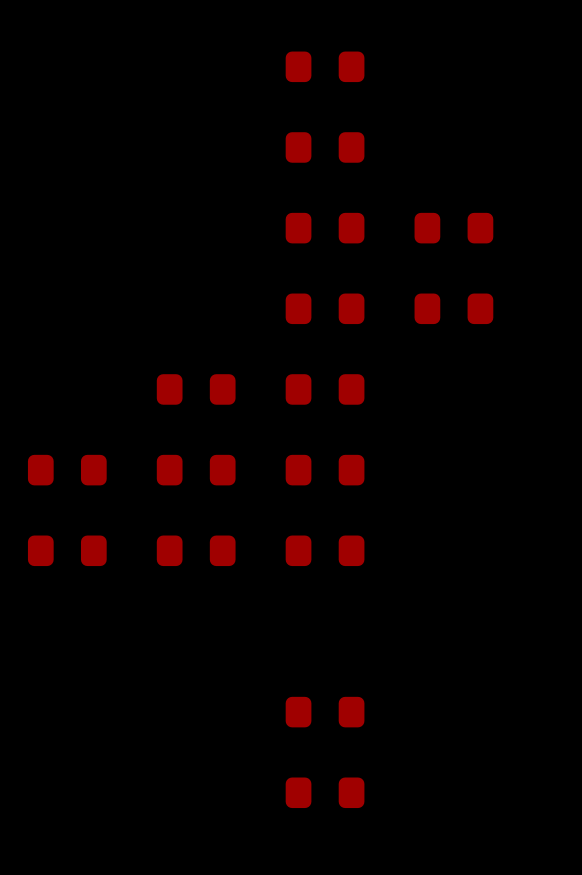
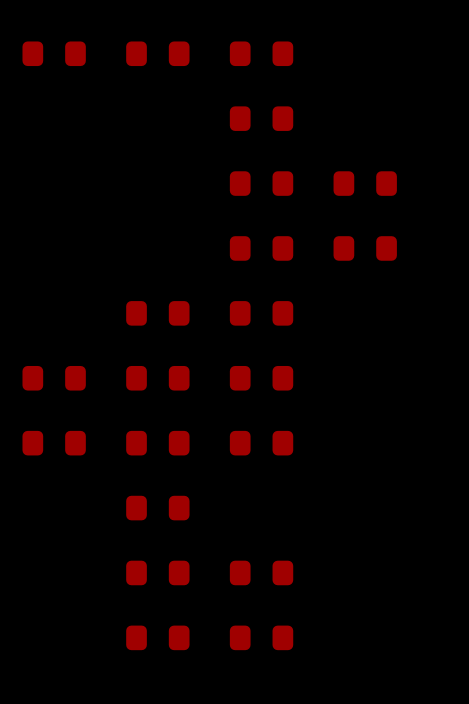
part: none -> (54, 53)
part: none -> (157, 53)
part: none -> (157, 508)
part: none -> (157, 572)
part: none -> (157, 637)

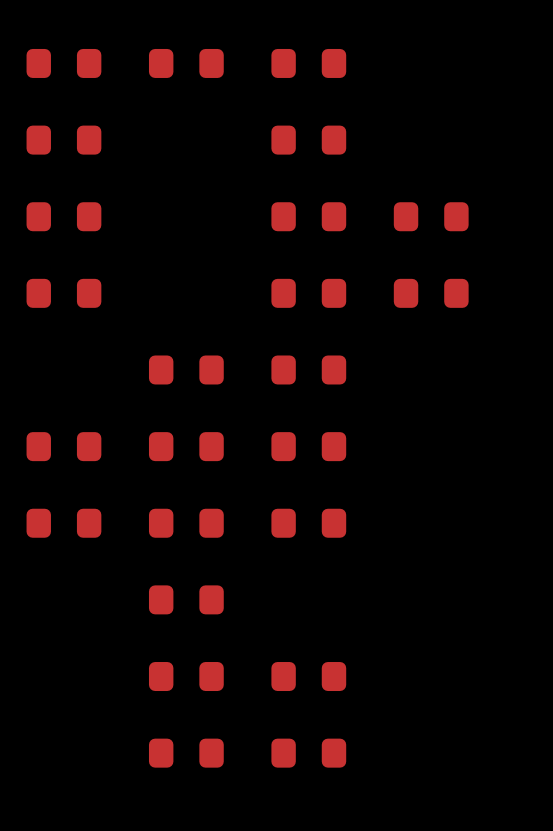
part: none -> (63, 140)
part: none -> (63, 216)
part: none -> (63, 293)

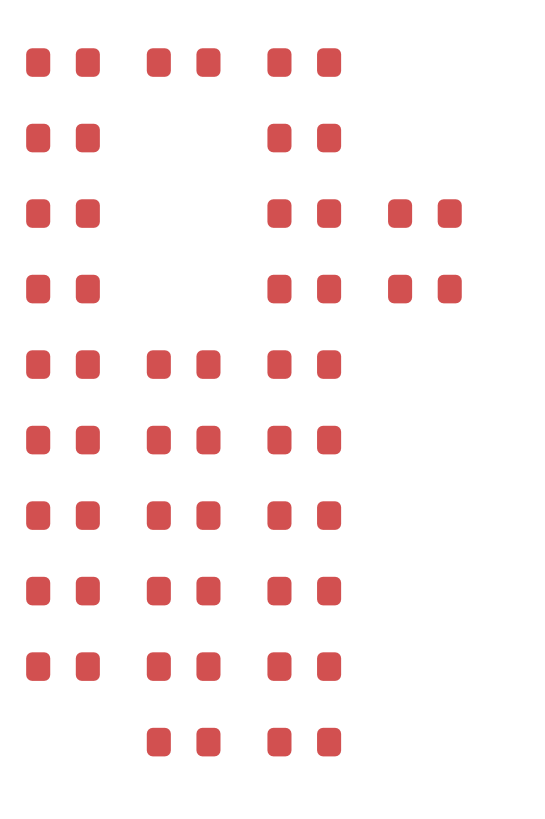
part: none -> (63, 364)
part: none -> (63, 591)
part: none -> (304, 591)
part: none -> (63, 666)

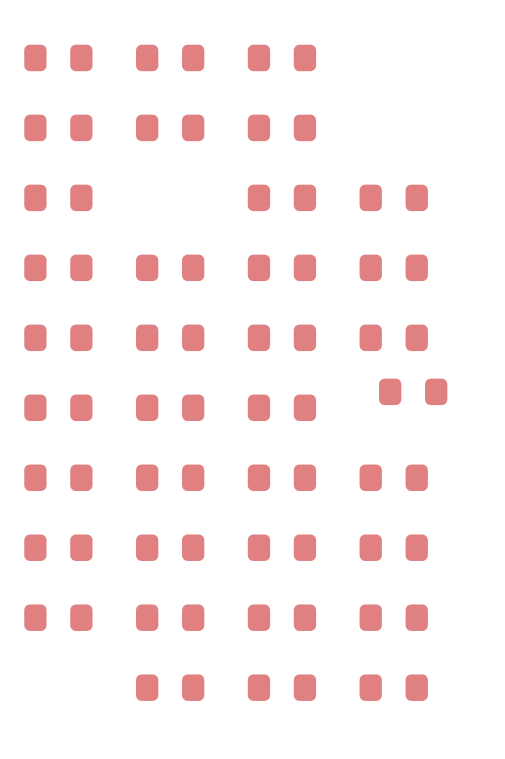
part: none -> (170, 127)
part: none -> (170, 267)
part: none -> (393, 337)
part: none -> (413, 391)
part: none -> (393, 477)
part: none -> (393, 547)
part: none -> (393, 617)
part: none -> (393, 687)

